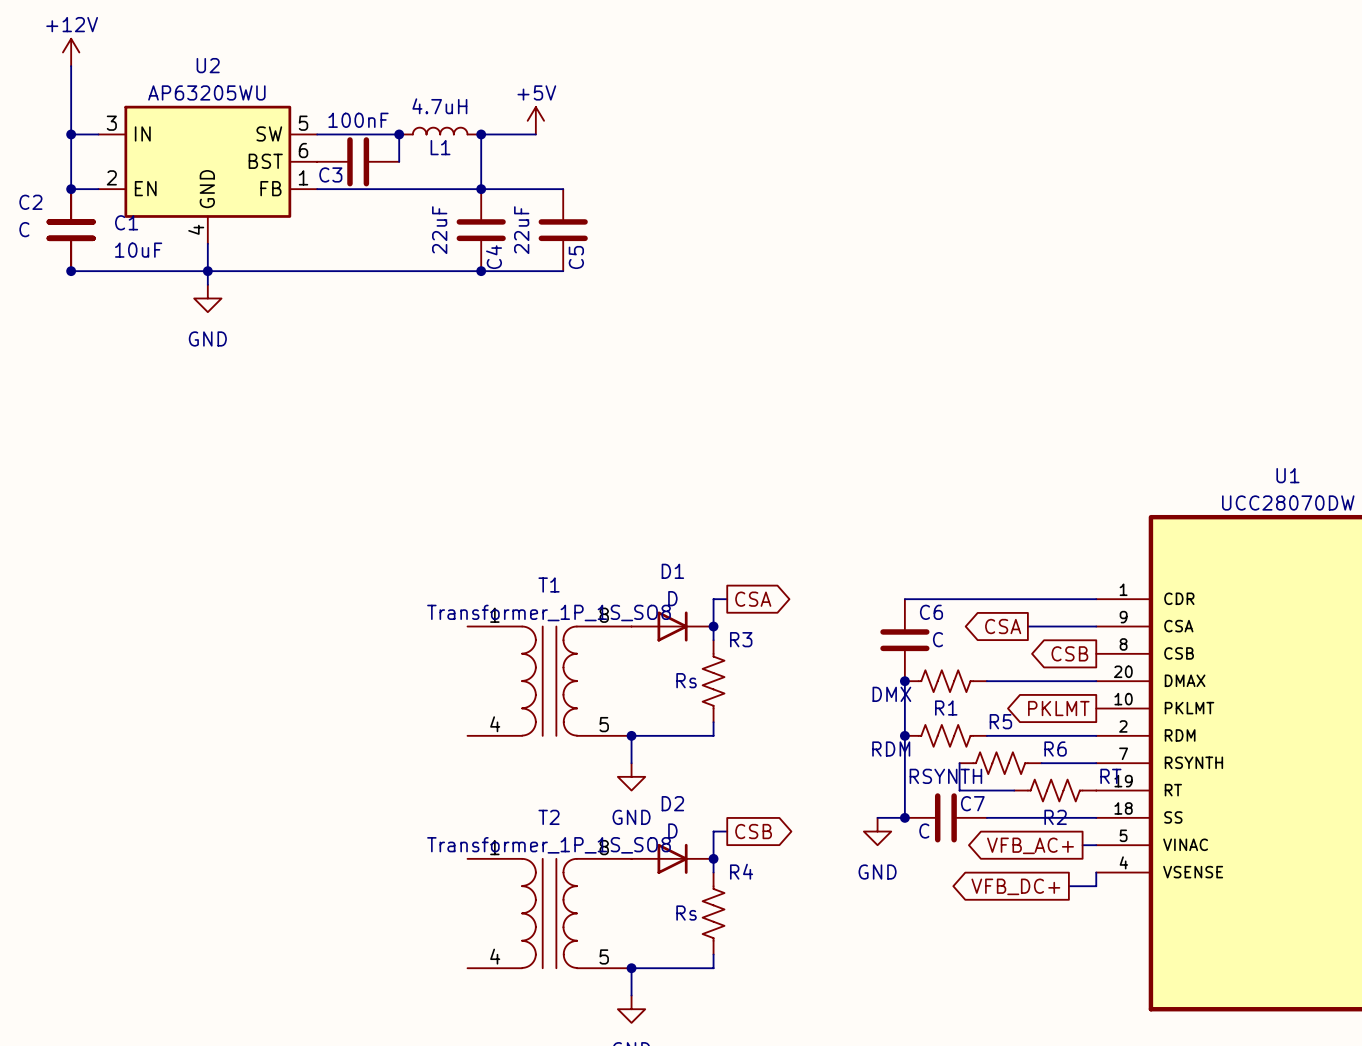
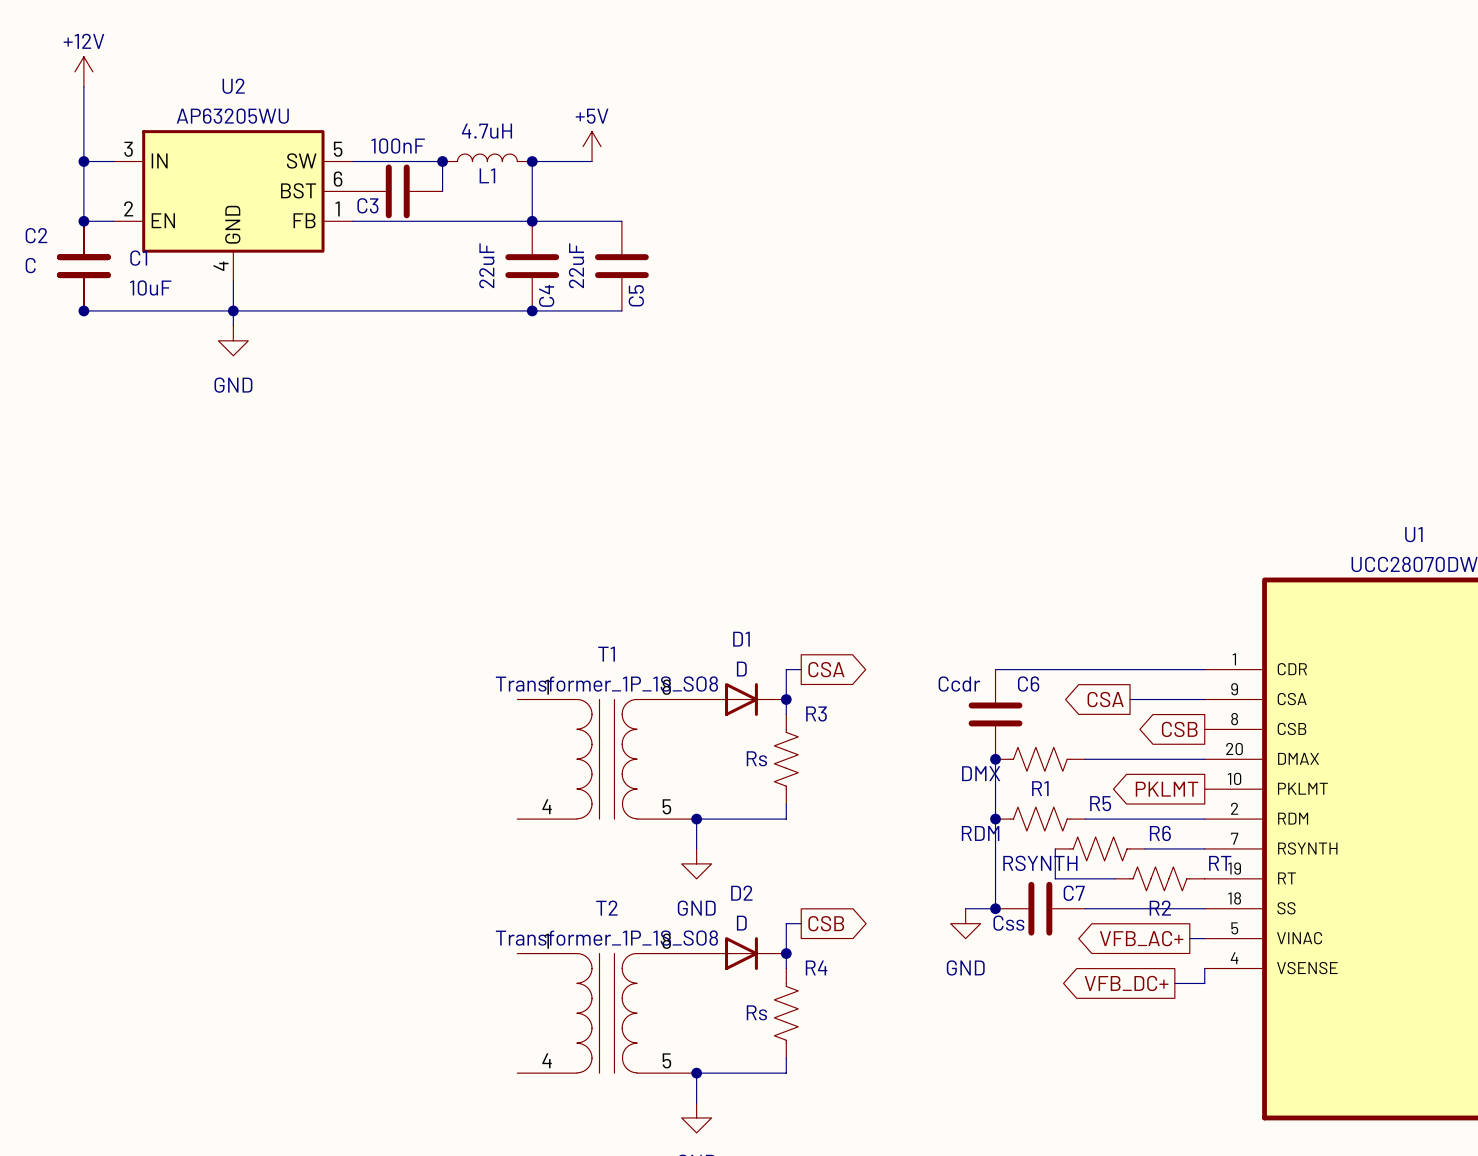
C6 value: C (937, 639) -> Ccdr (959, 684)
C7 value: C (924, 831) -> Css (1008, 923)

